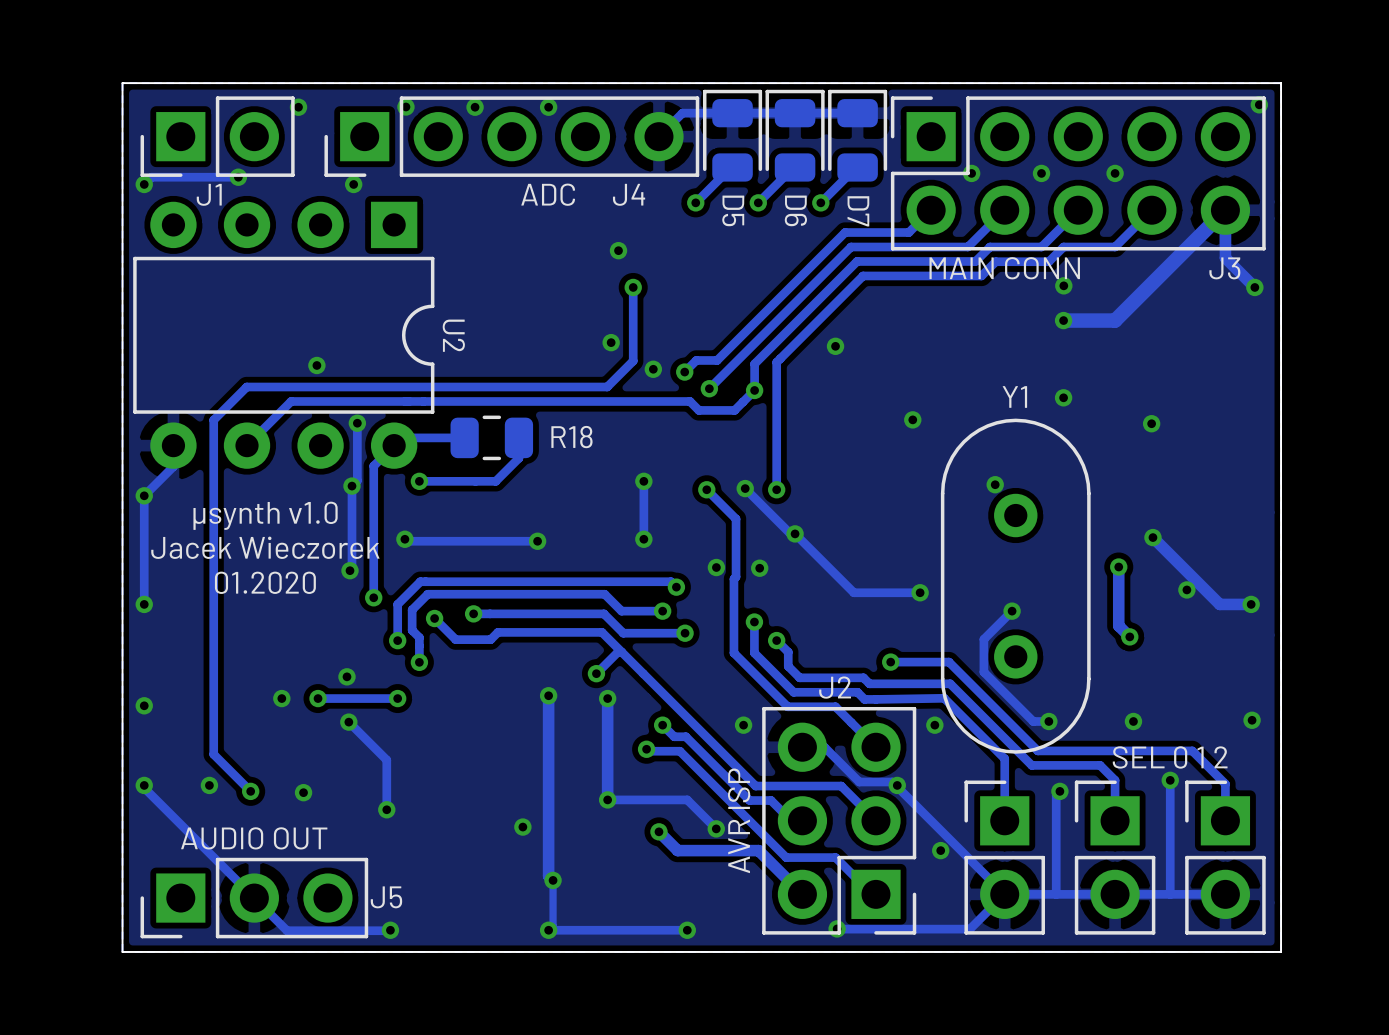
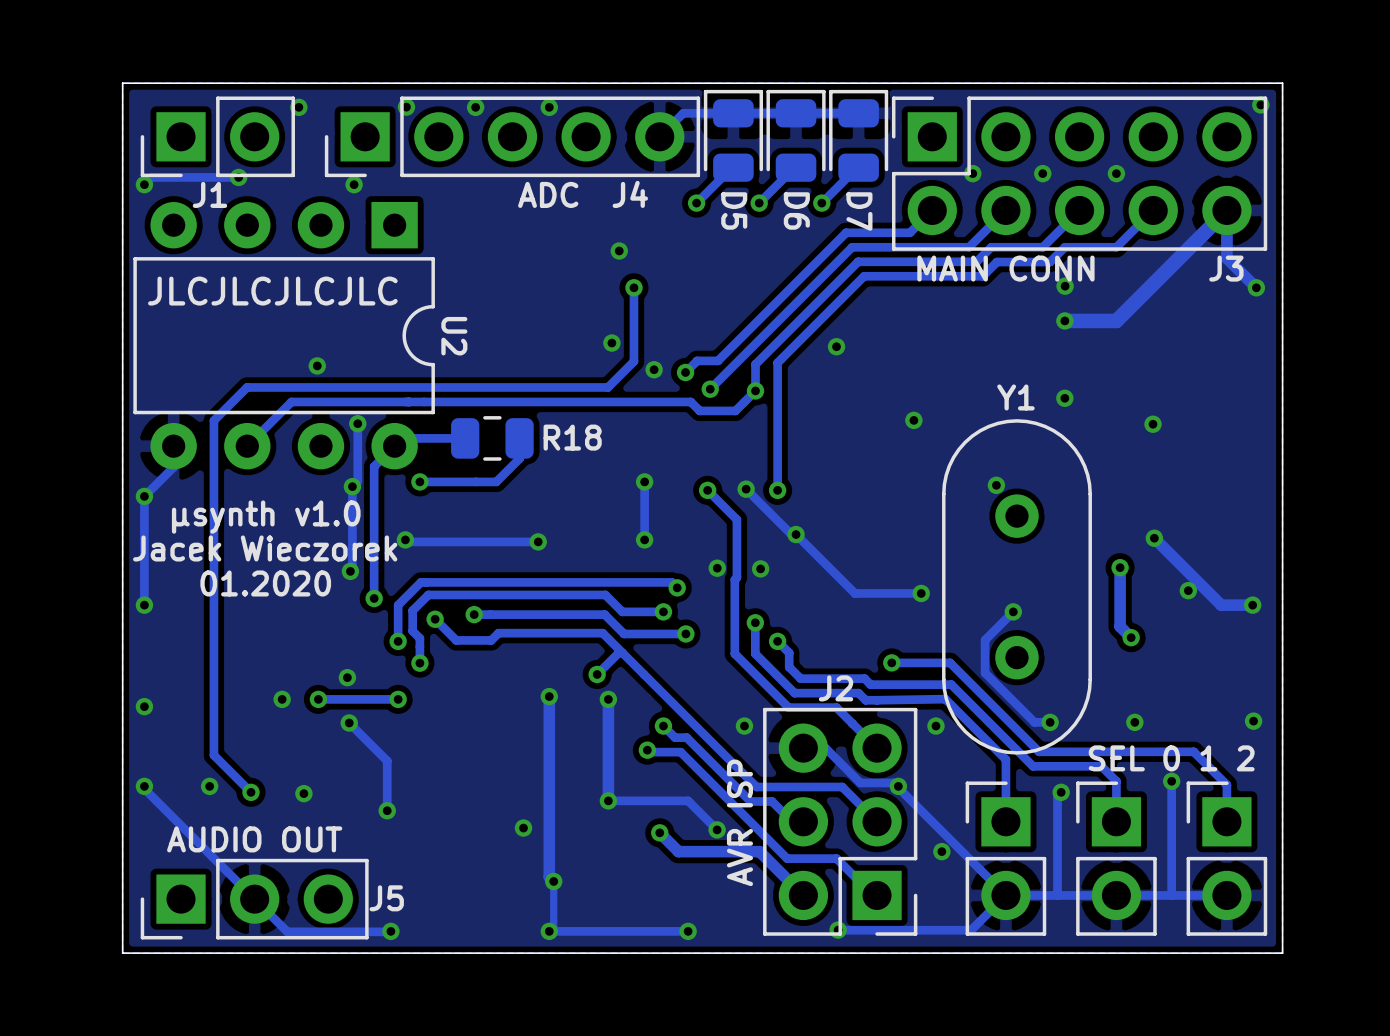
text: none -> JLCJLCJLCJLC (272, 291)

